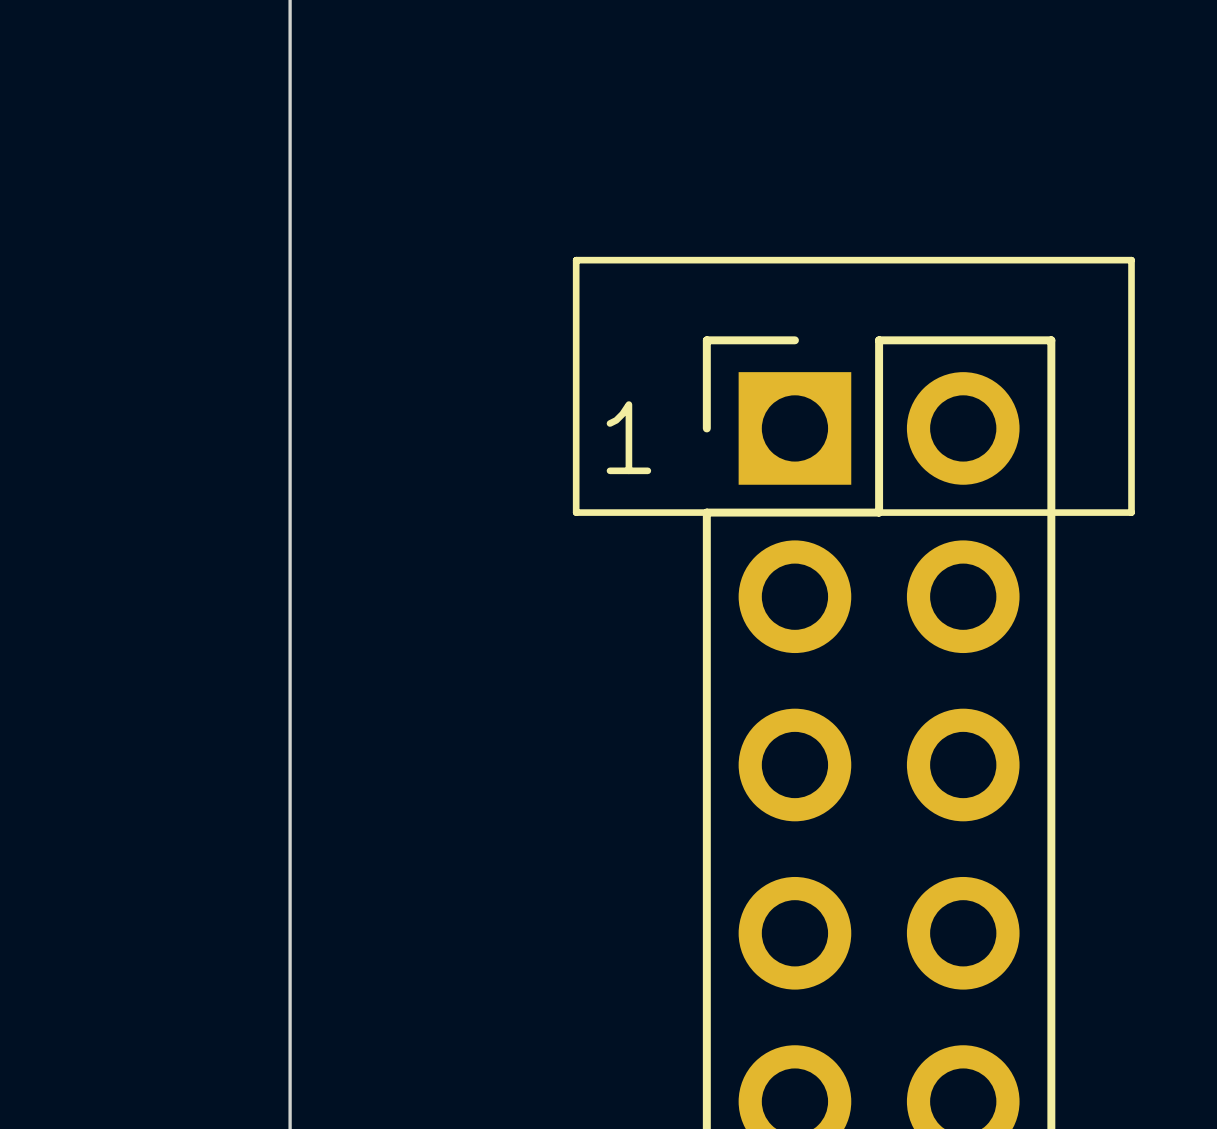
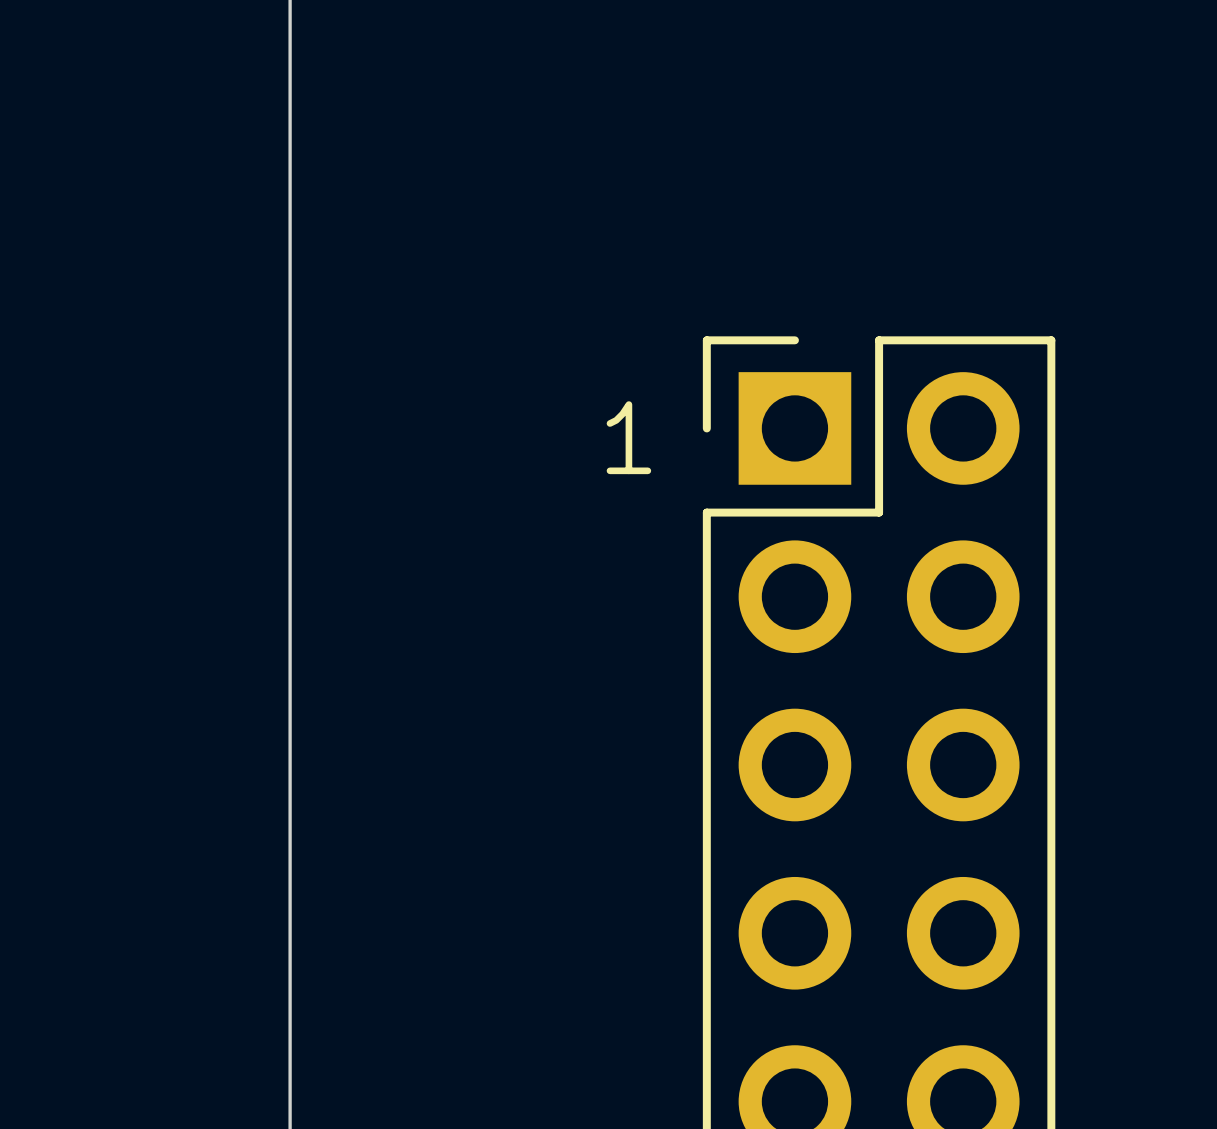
line: (576, 260) (1131, 260) (1131, 512) (576, 512) (576, 260) -> none

